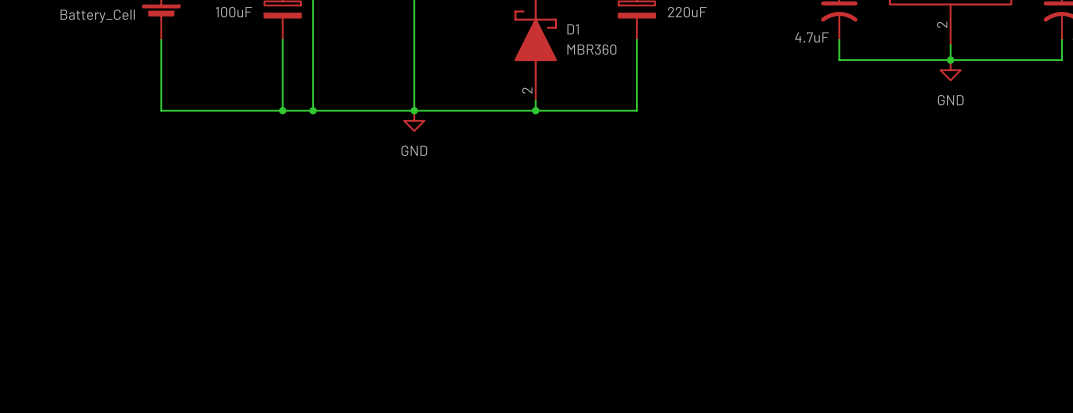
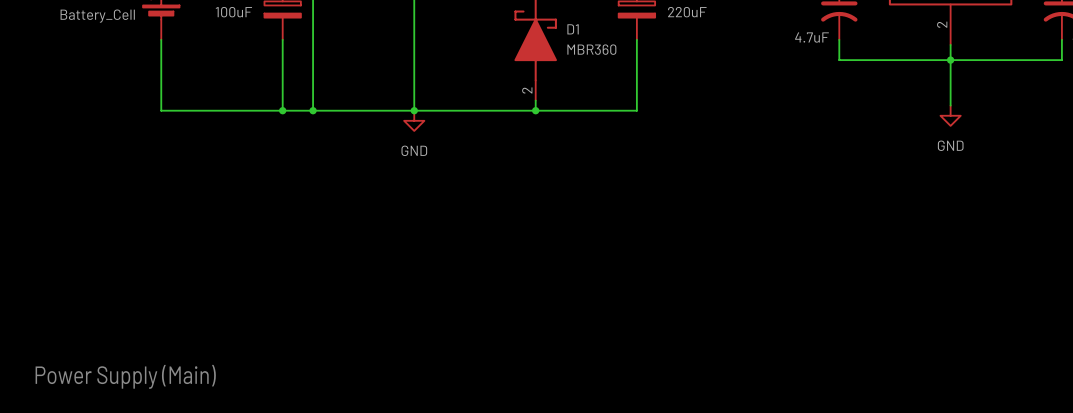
wire: none -> (950, 60) (950, 105)
power symbol position: GND (950, 70) -> GND (950, 115)
text: none -> Power Supply (Main) (125, 376)

